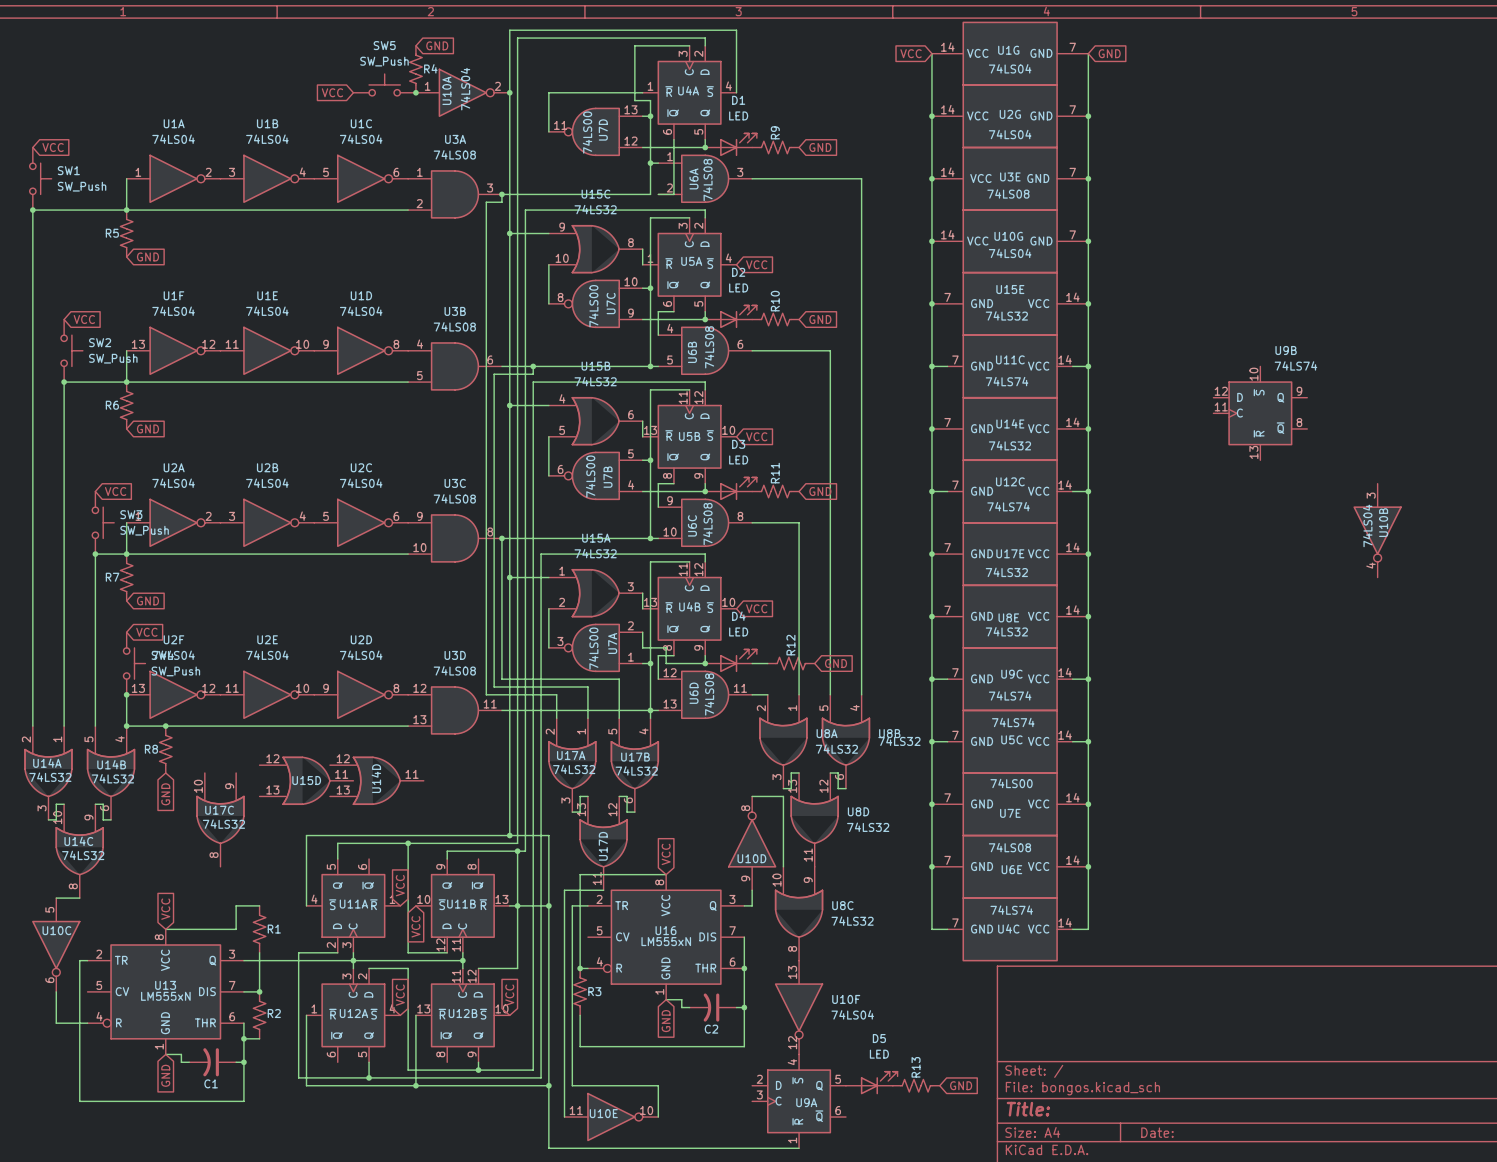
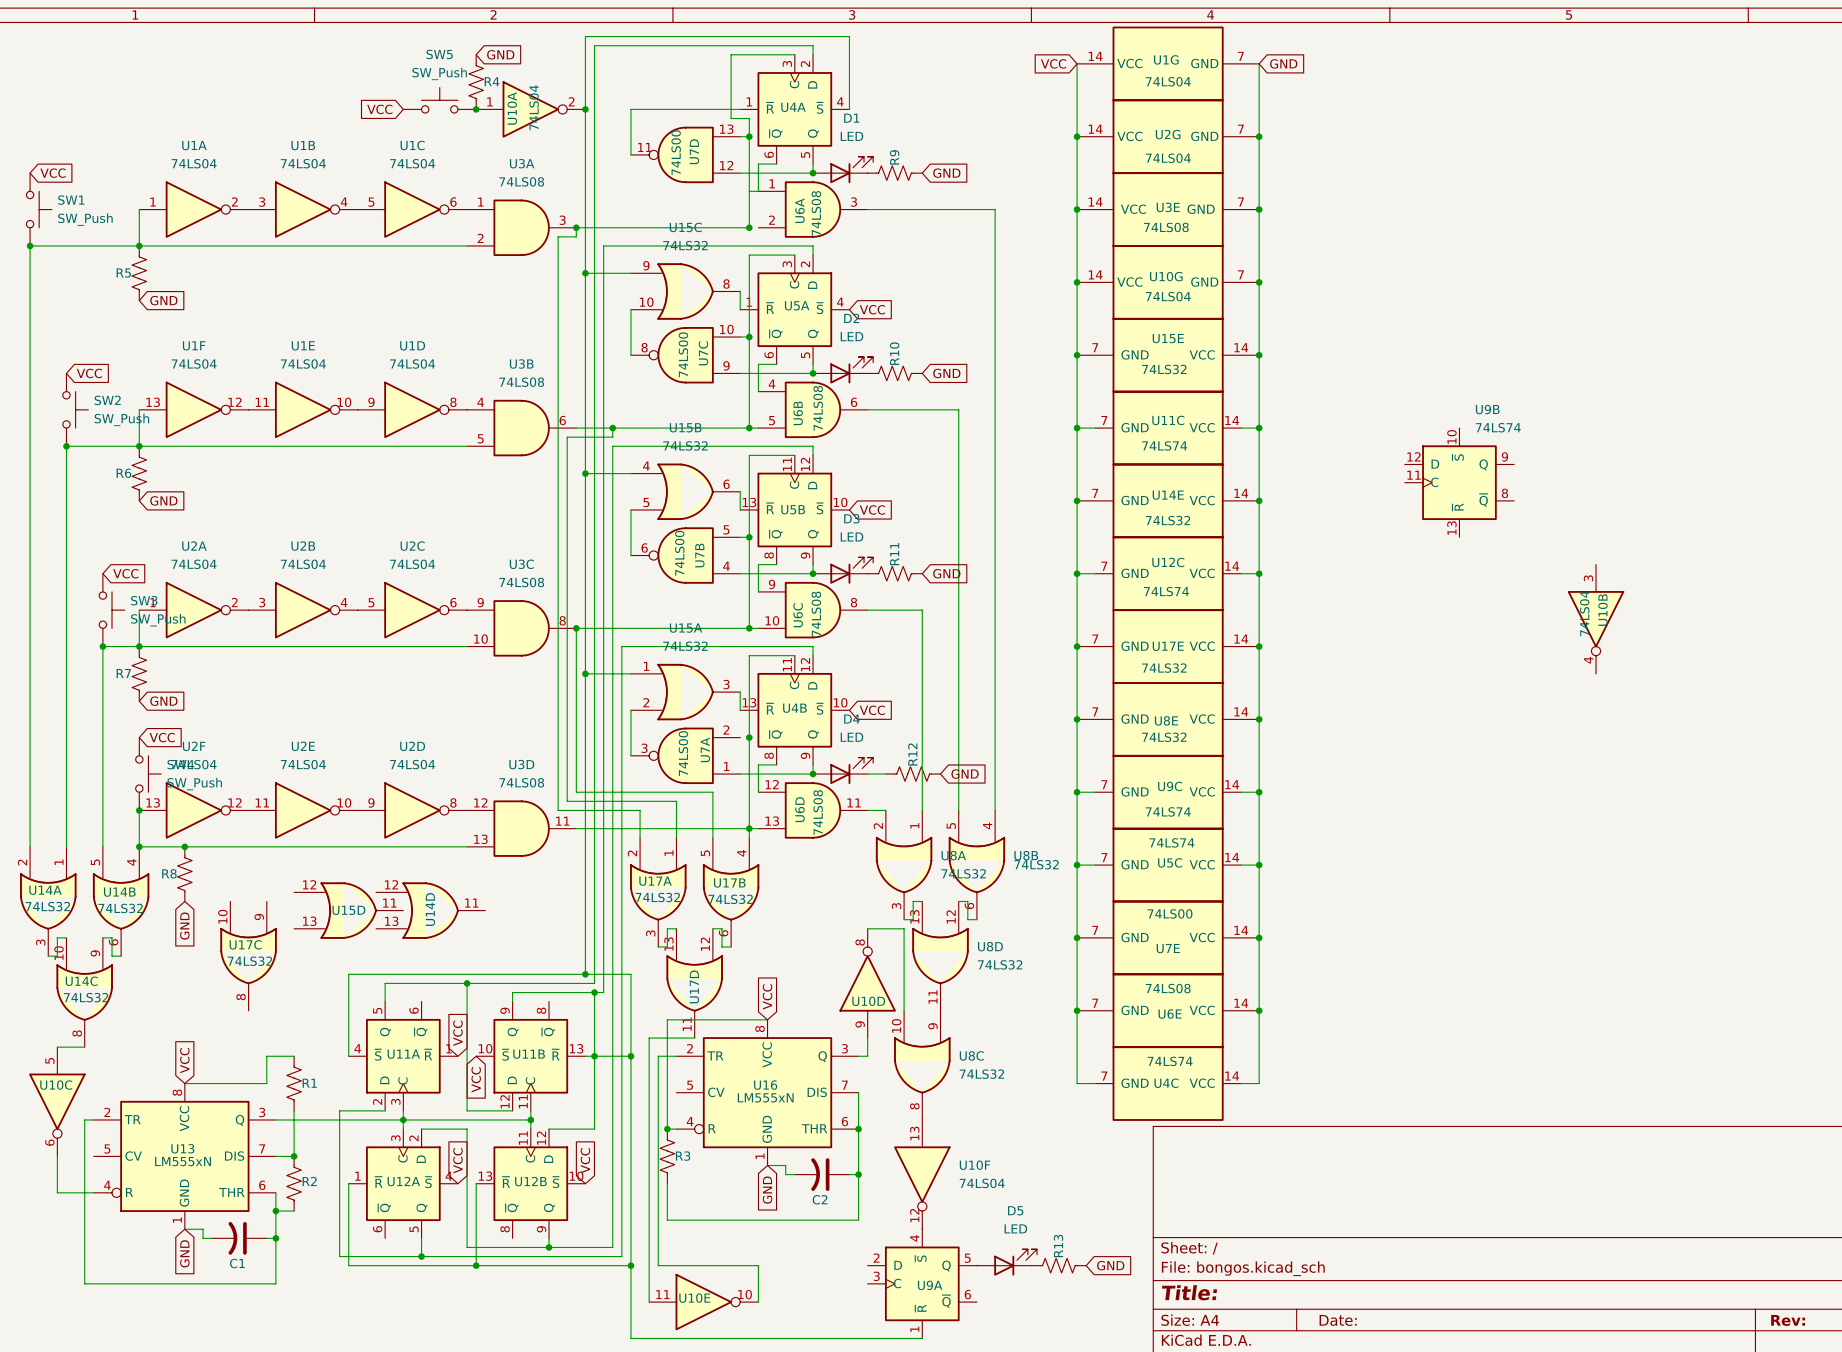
wire: (673, 139) (673, 194) (658, 194) -> (776, 164) (758, 164) (758, 191)
junction position: (650, 163) -> (749, 227)
wire: (642, 632) (642, 647) (666, 647) (666, 663) -> (749, 774) (767, 774)
junction position: (650, 663) -> (749, 737)

